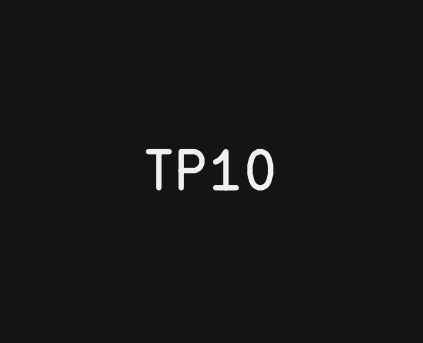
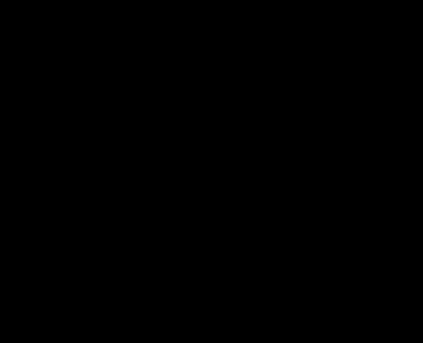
TP10: (209, 169) -> none

